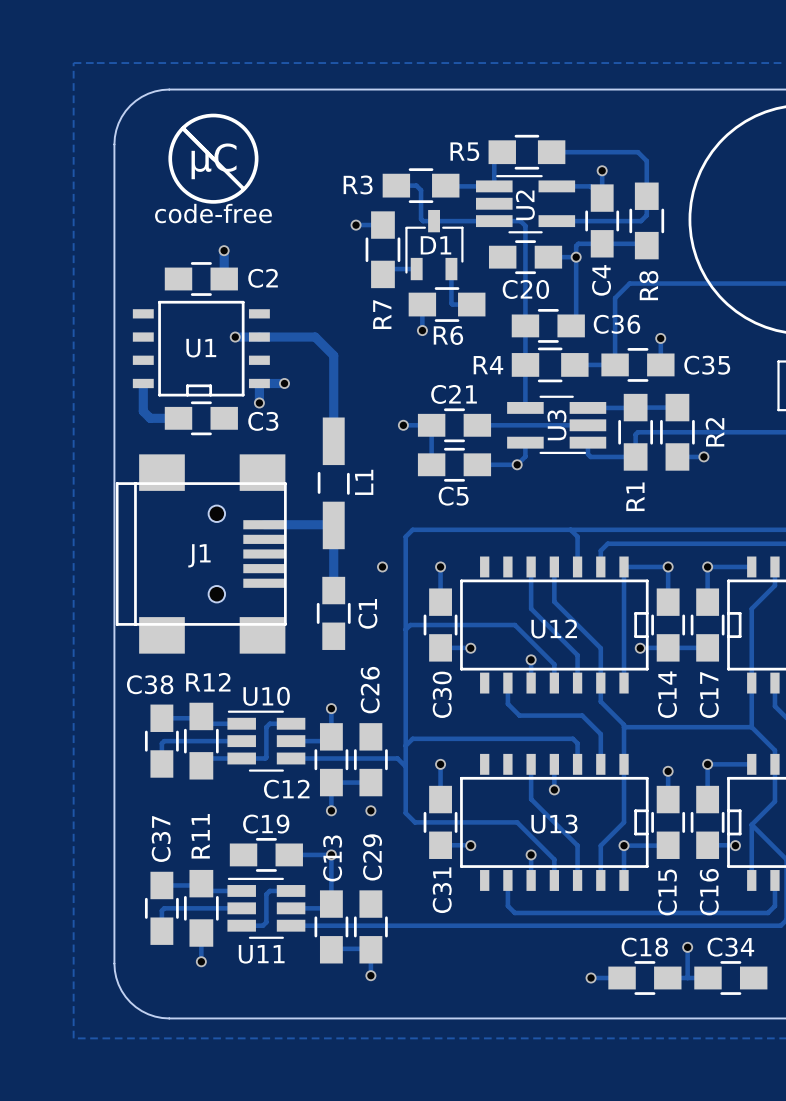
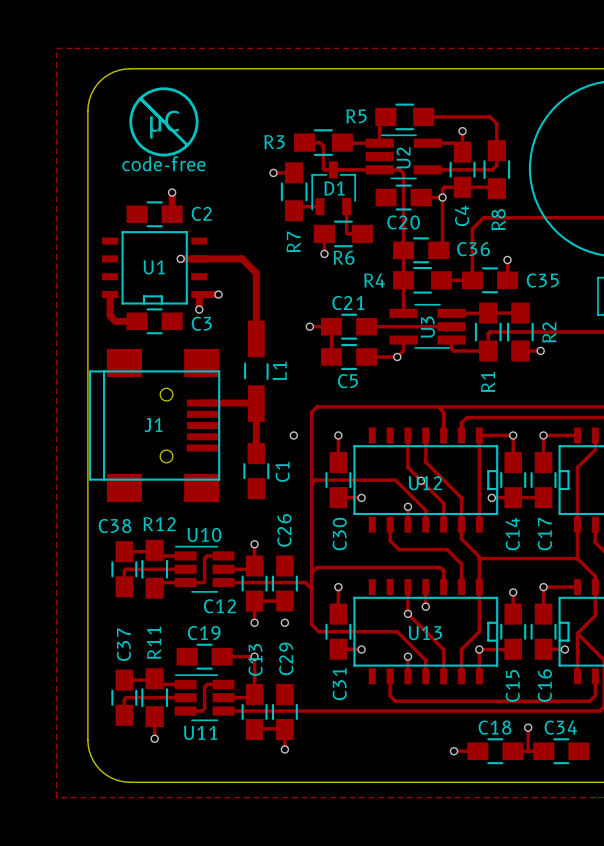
via: none -> (421, 480)
via: none -> (407, 613)

